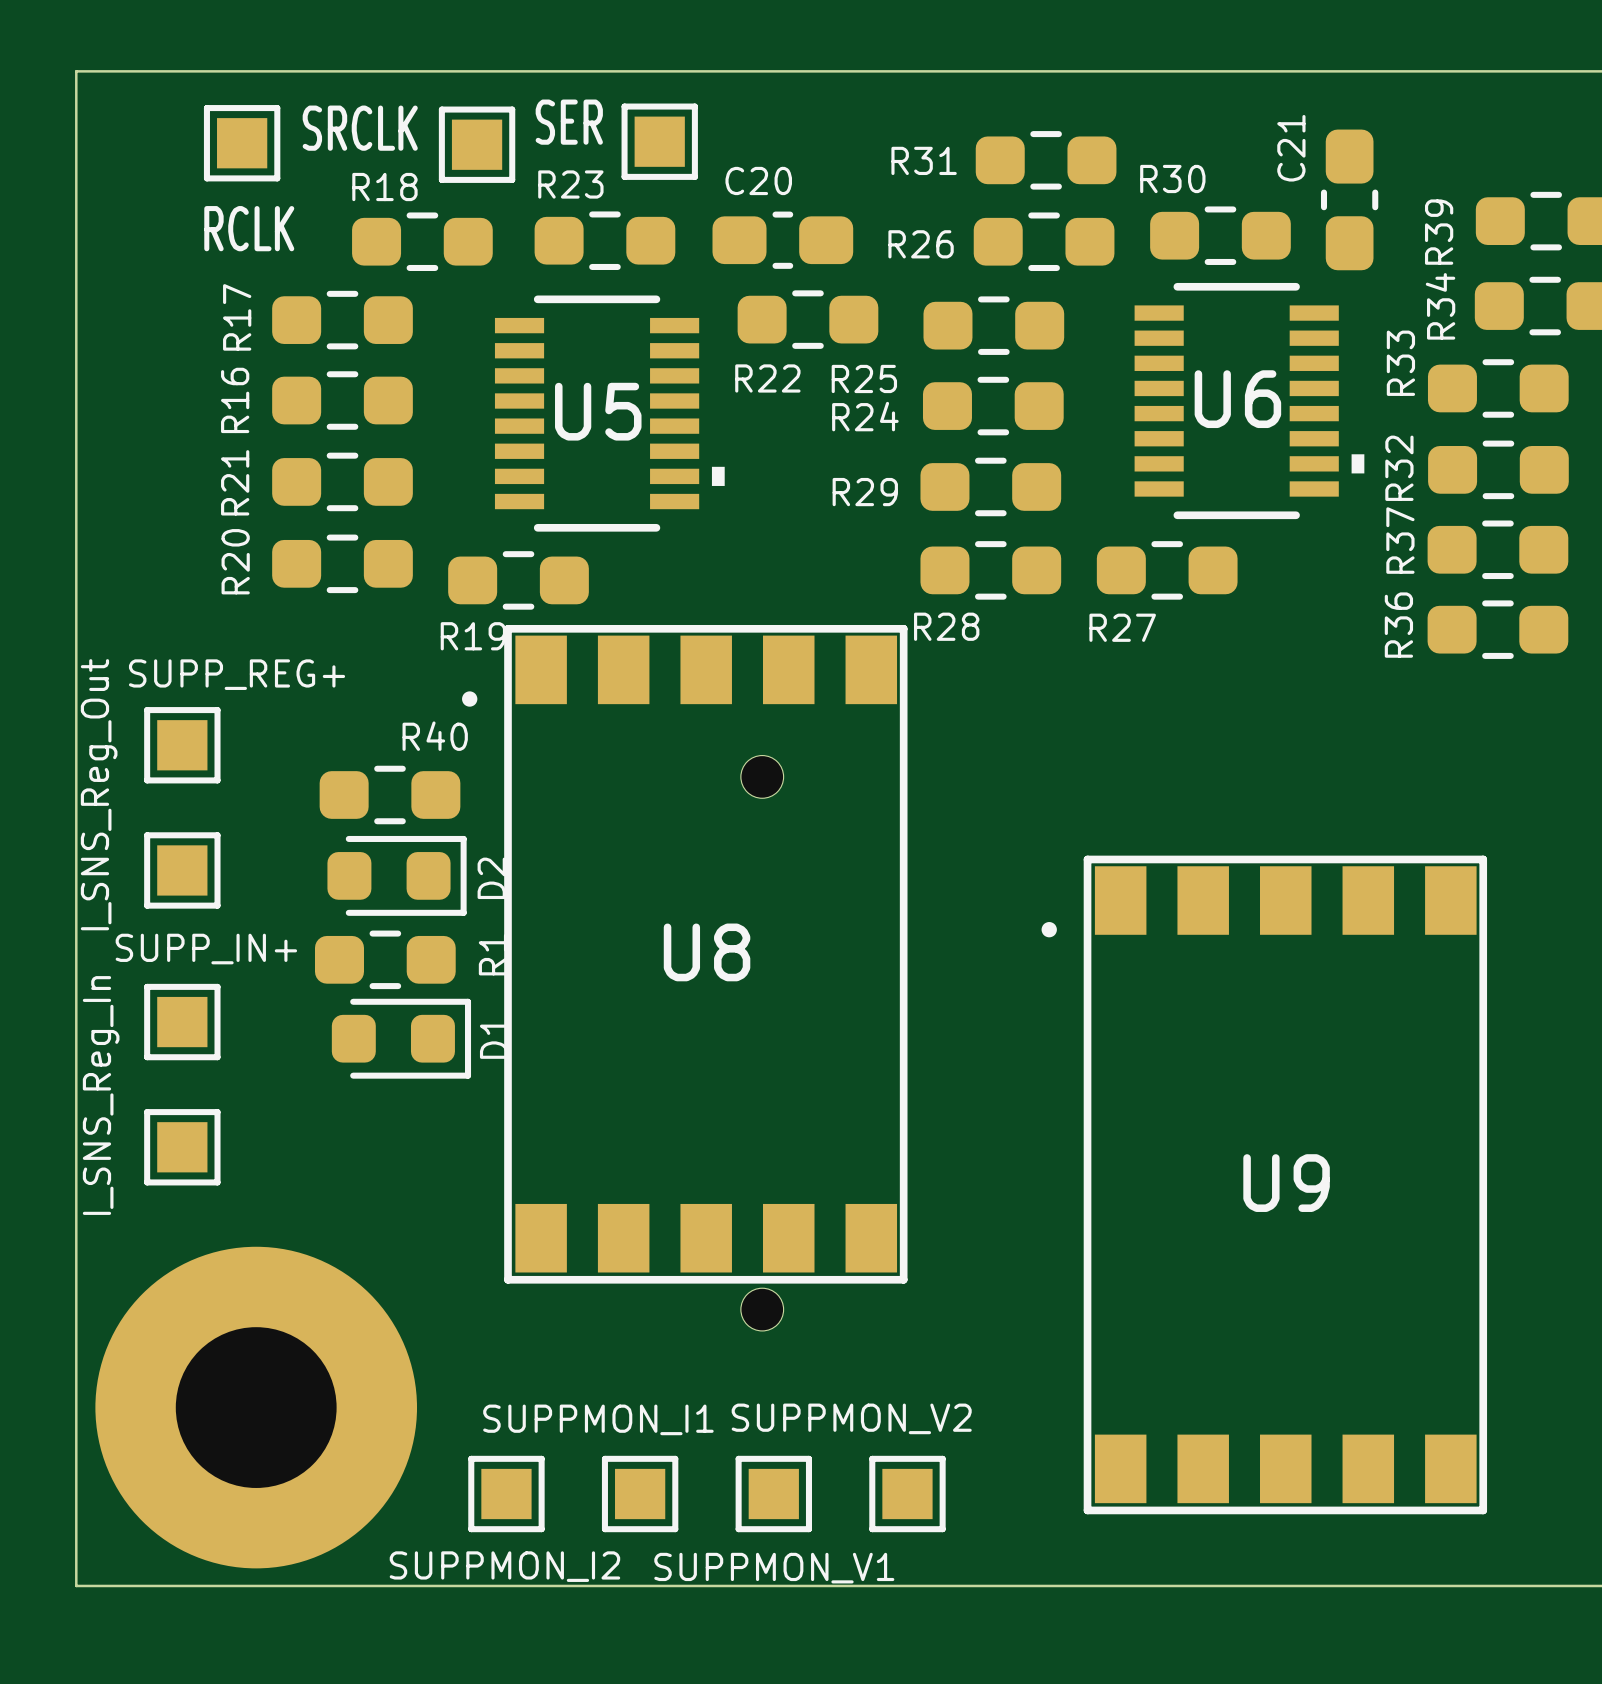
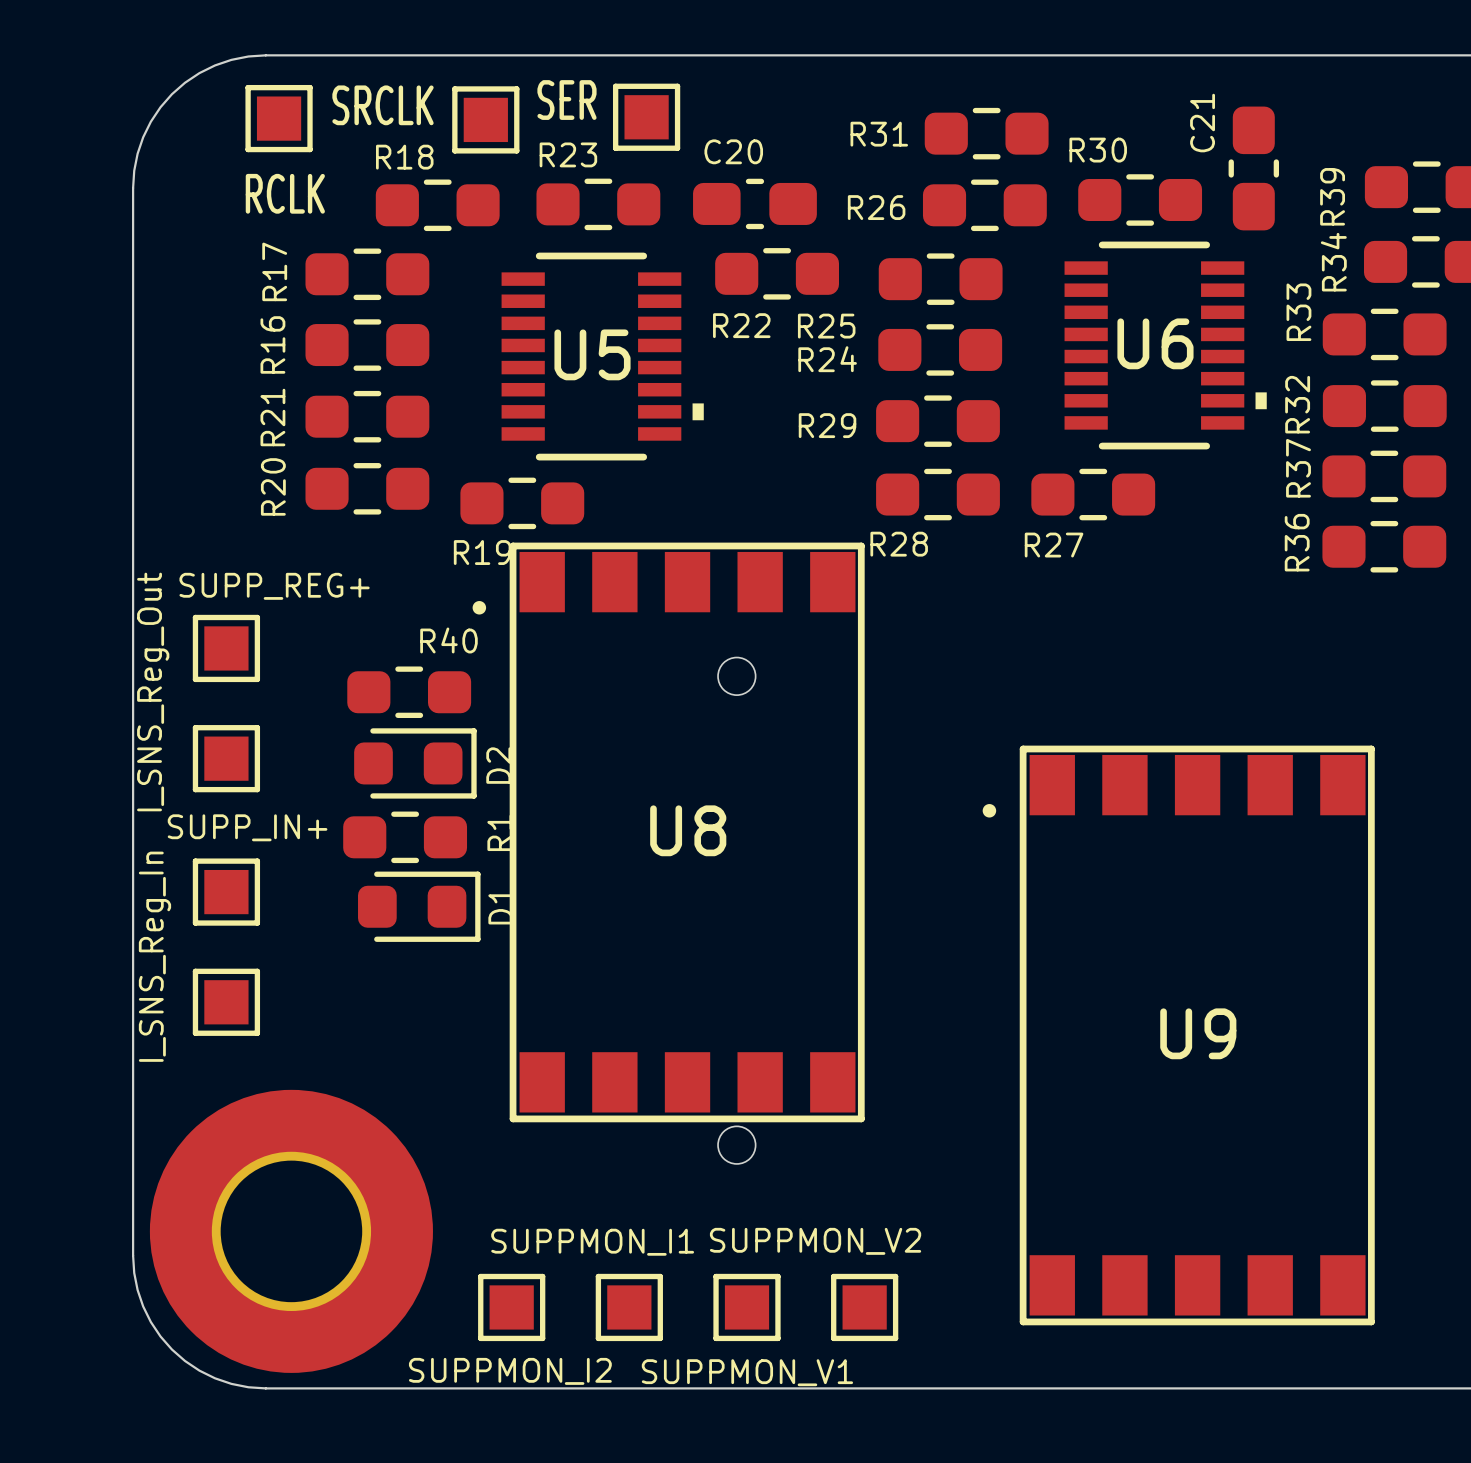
board edge: (227, 71) (76, 71) (76, 222) -> (265, 55) (248, 56) (215, 65) (199, 73) (171, 94) (150, 121) (143, 137) (134, 170) (133, 188)
board edge: (76, 1435) (76, 1585) (227, 1585) -> (133, 1255) (137, 1290) (143, 1306) (150, 1322) (171, 1349) (185, 1360) (215, 1378) (231, 1383) (265, 1388)

